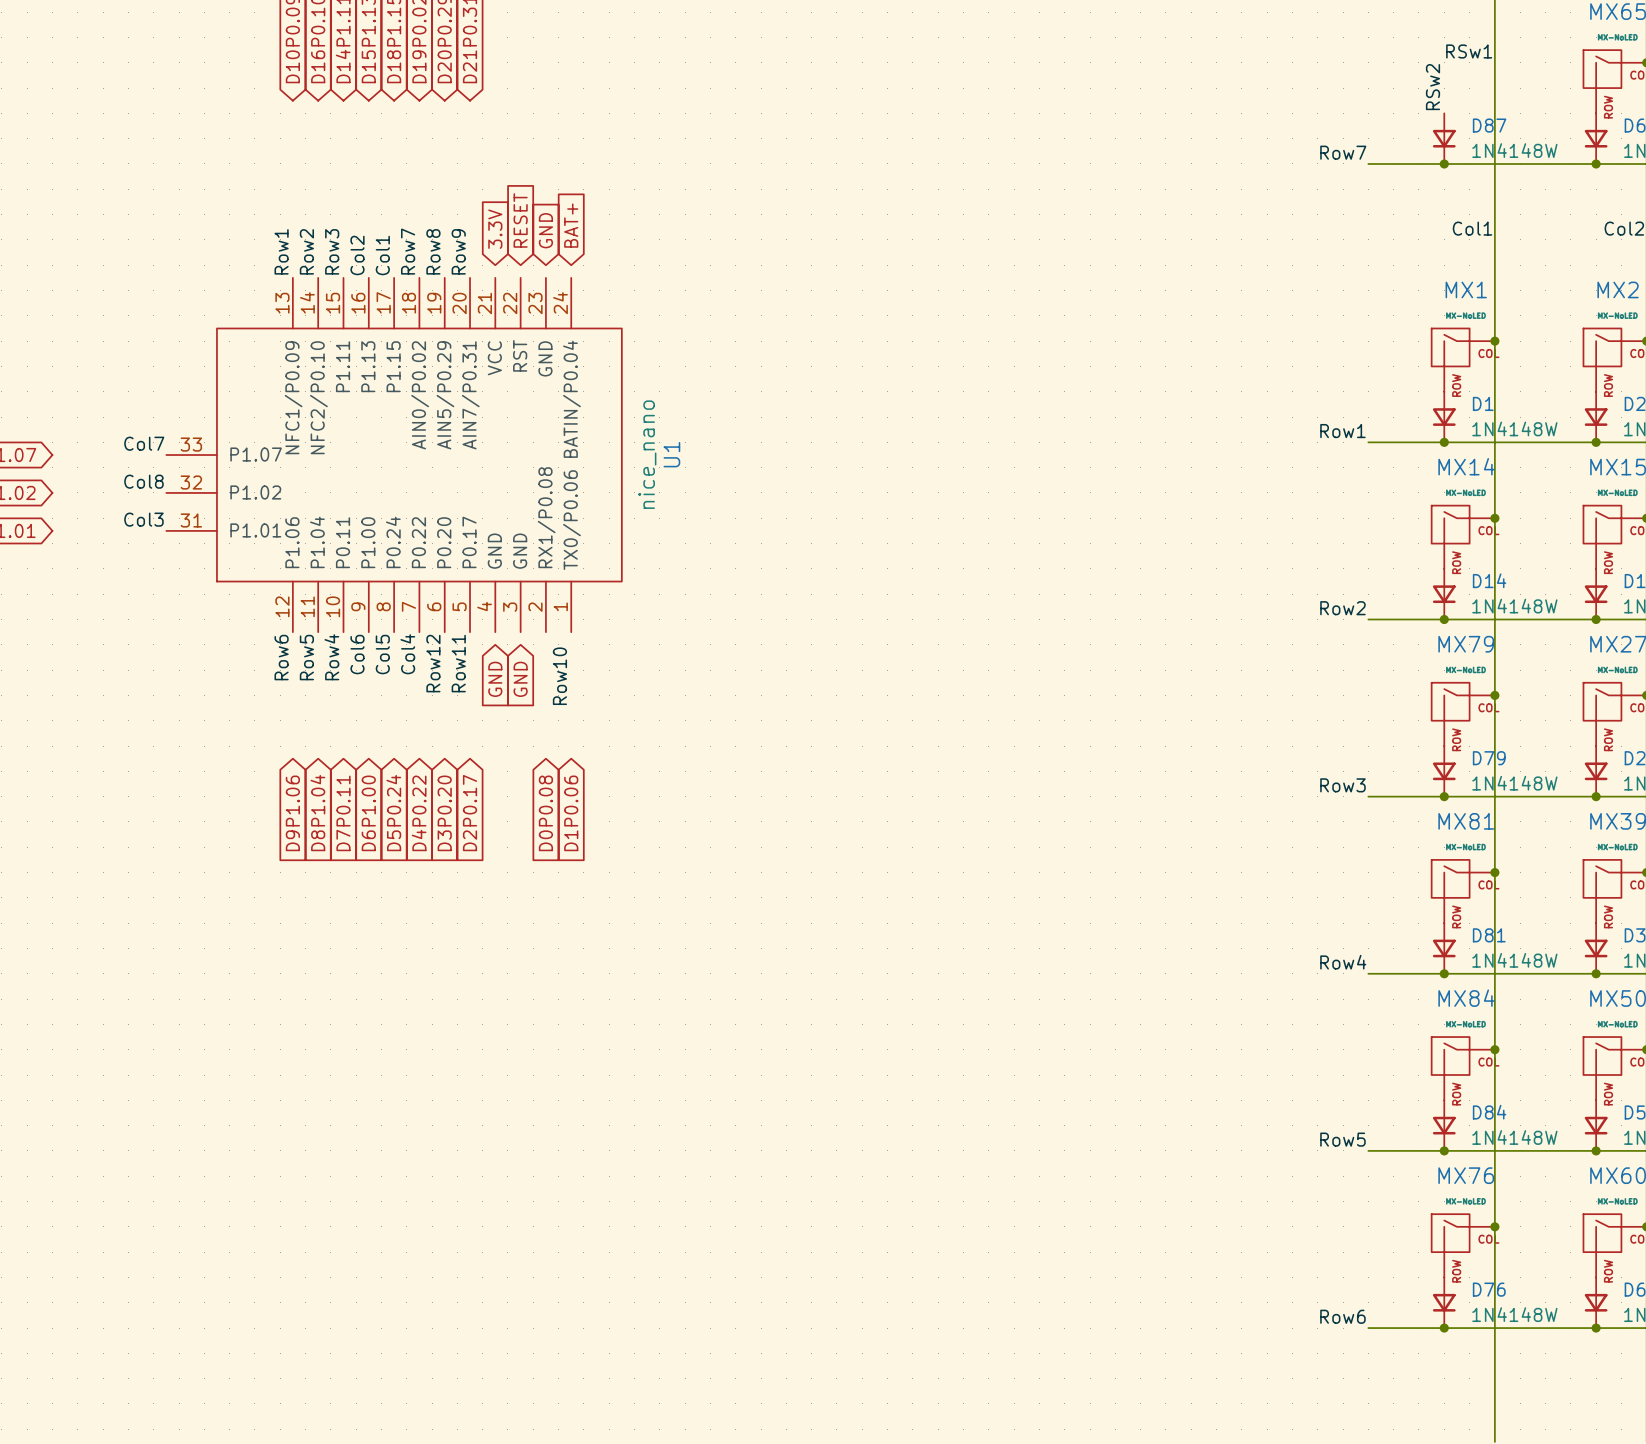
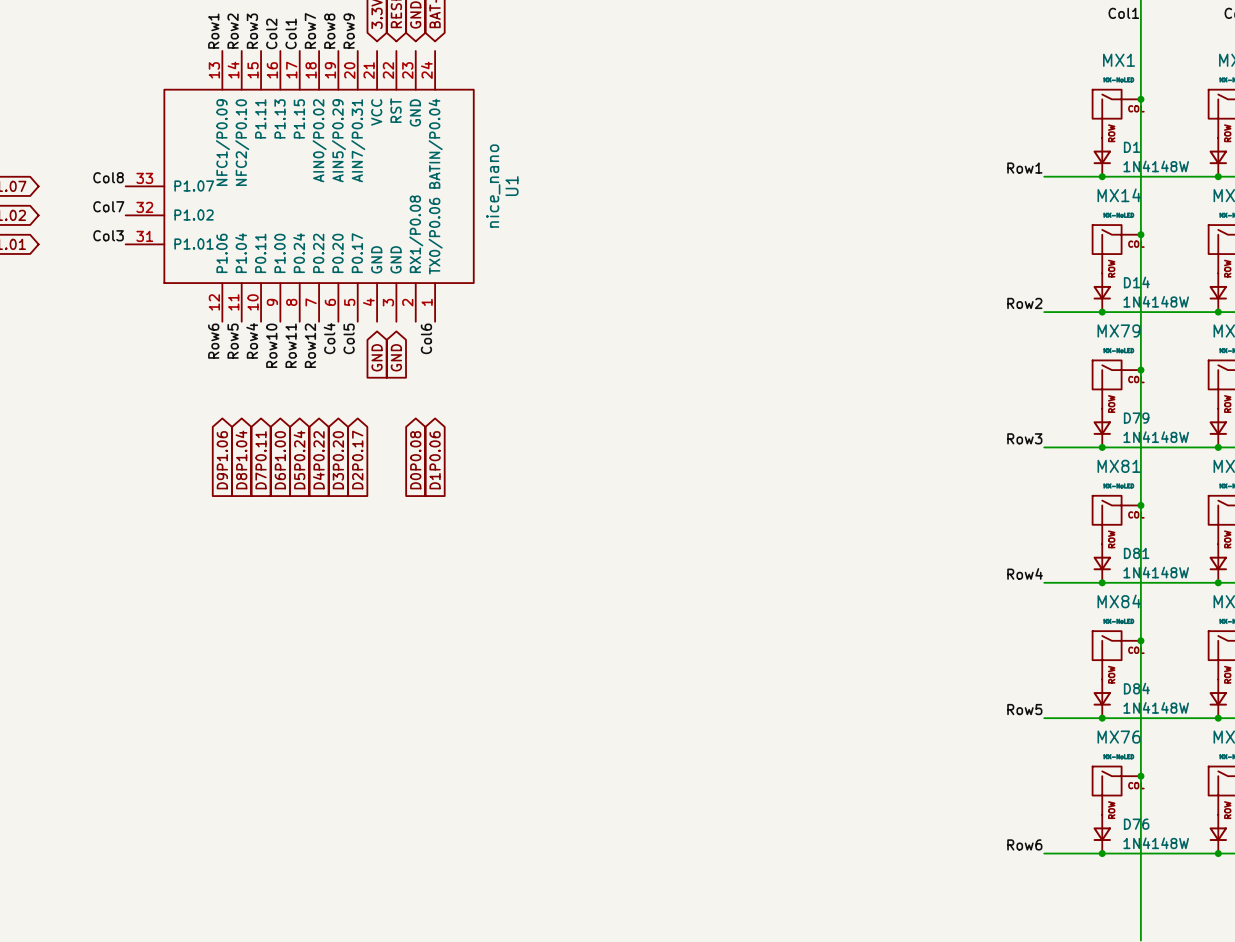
label: Col7 (144, 443) -> Col8 (108, 177)
label: Col8 (143, 481) -> Col7 (108, 206)
label: Col6 (357, 654) -> Row10 (271, 345)
label: Col5 (382, 654) -> Row11 (291, 345)
label: Col4 (407, 654) -> Row12 (310, 345)
label: none -> Col6 (426, 338)
label: Row12 (433, 663) -> Col4 (329, 338)
label: Row11 (458, 663) -> Col5 (349, 338)
label: Row10 (559, 676) -> none

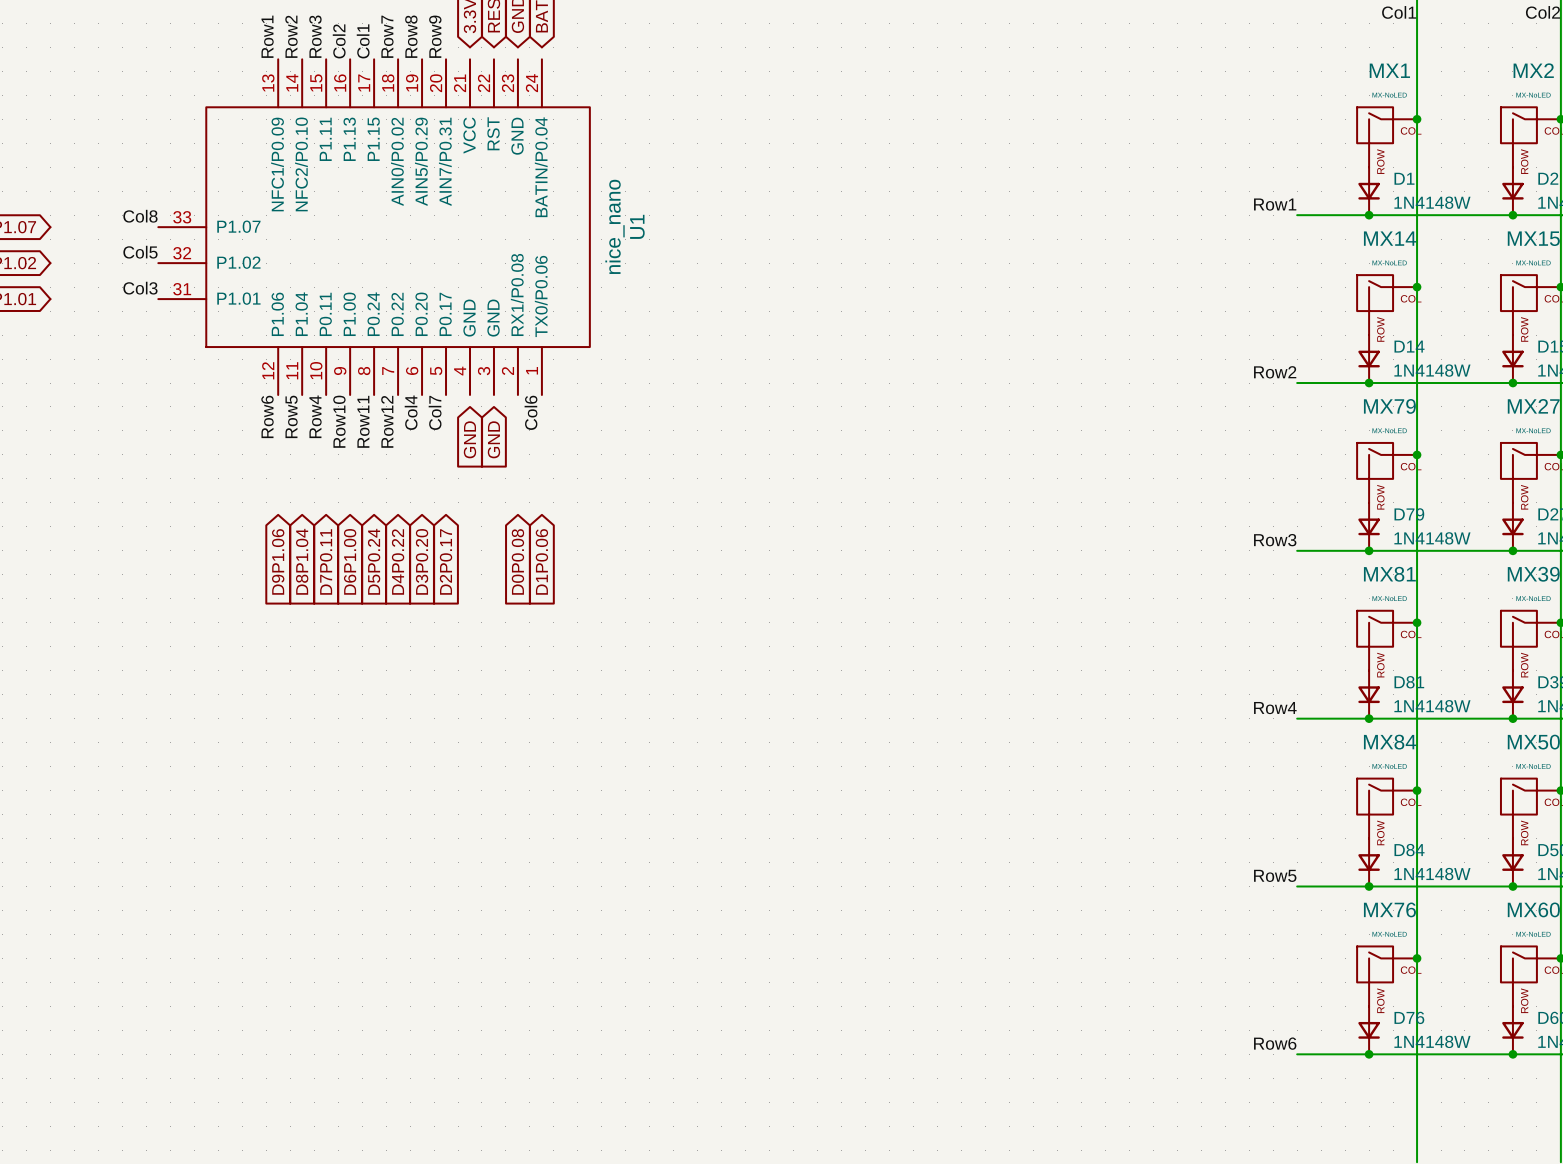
label: Col7 (108, 206) -> Col5 (140, 252)
label: Col5 (349, 338) -> Col7 (435, 412)

